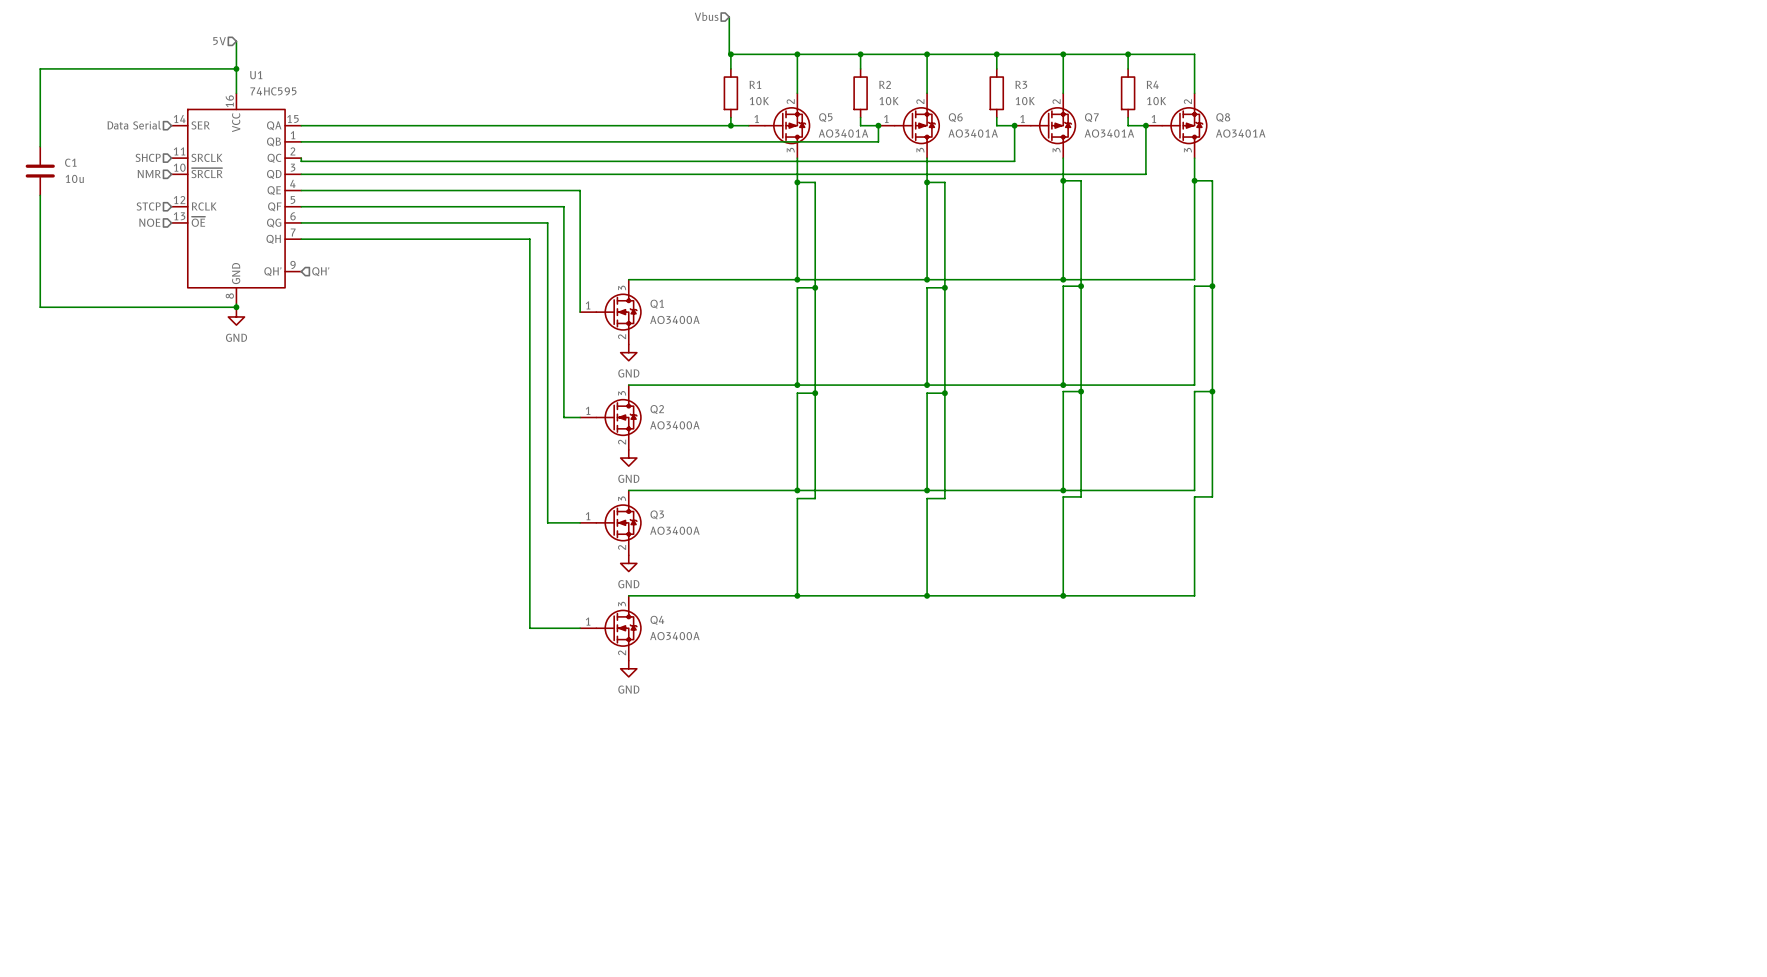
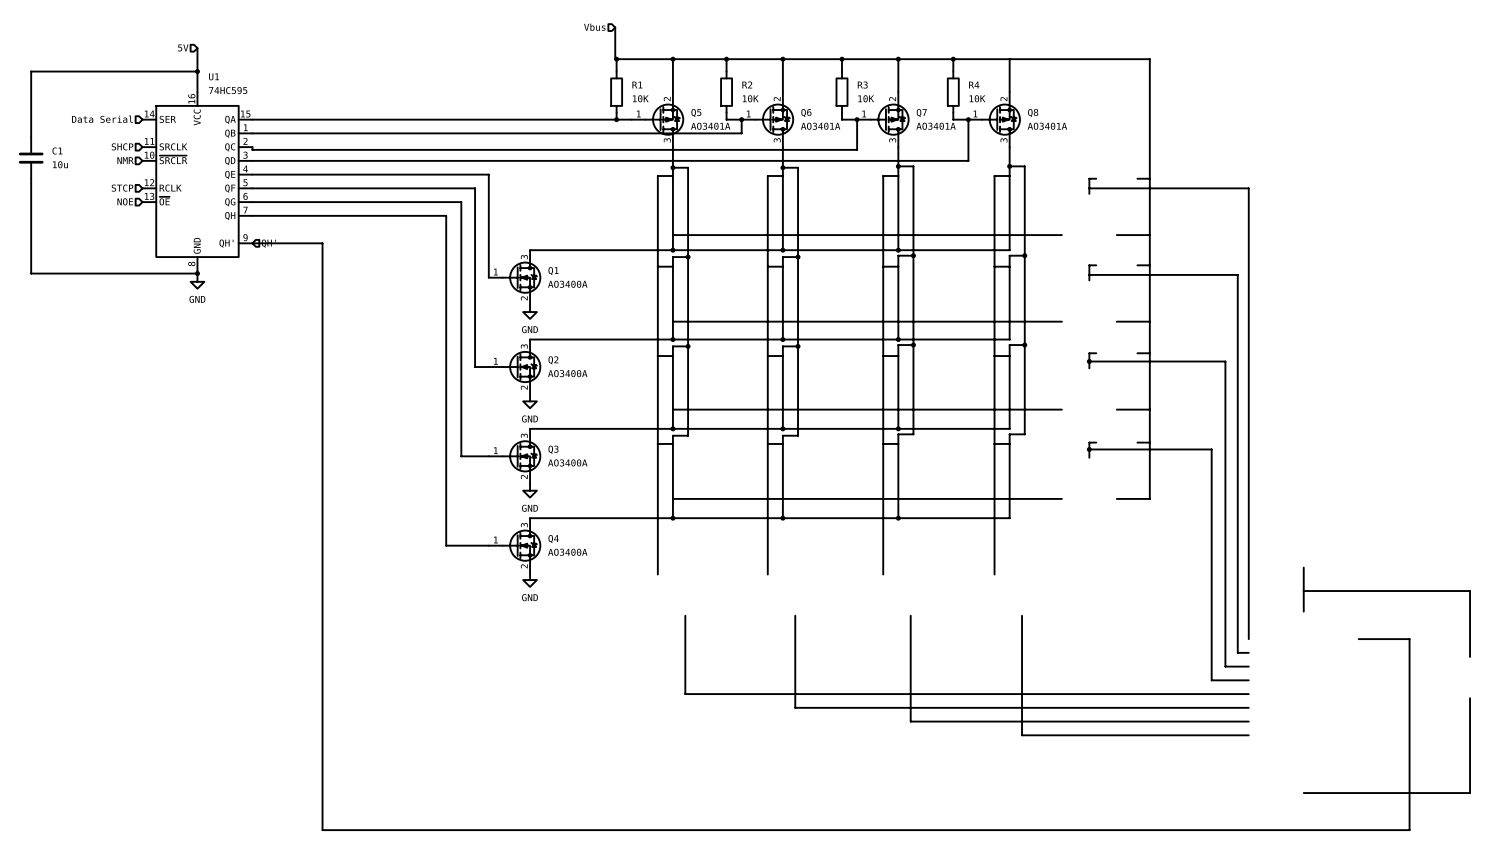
wire: none -> (1009, 59) (1149, 59) (1149, 498) (1116, 498)
wire: none -> (672, 175) (657, 175) (657, 574)
wire: none -> (782, 175) (767, 175) (767, 574)
wire: none -> (898, 175) (883, 175) (883, 574)
wire: none -> (1009, 175) (994, 175) (994, 574)
wire: none -> (1096, 178) (1089, 178) (1089, 193)
wire: none -> (1137, 178) (1149, 178)
wire: none -> (1089, 188) (1248, 188) (1248, 639)
wire: none -> (672, 235) (1061, 235)
wire: none -> (1116, 235) (1149, 235)
wire: none -> (252, 243) (322, 243) (322, 830) (1409, 830) (1409, 639) (1358, 639)
wire: none -> (1096, 265) (1089, 265) (1089, 280)
wire: none -> (1137, 265) (1149, 265)
wire: none -> (657, 266) (672, 266)
wire: none -> (767, 266) (782, 266)
wire: none -> (883, 266) (898, 266)
wire: none -> (994, 266) (1009, 266)
wire: none -> (1089, 274) (1237, 274) (1237, 652) (1248, 652)
wire: none -> (672, 321) (1061, 321)
wire: none -> (1116, 321) (1149, 321)
wire: none -> (1096, 353) (1089, 353) (1089, 368)
wire: none -> (1137, 353) (1149, 353)
wire: none -> (657, 356) (672, 356)
wire: none -> (767, 356) (782, 356)
wire: none -> (883, 356) (898, 356)
wire: none -> (994, 356) (1009, 356)
wire: none -> (1089, 361) (1225, 361) (1225, 666) (1248, 666)
junction: none -> (1089, 361)
wire: none -> (672, 409) (1061, 409)
wire: none -> (1116, 409) (1149, 409)
wire: none -> (1096, 442) (1089, 442) (1089, 457)
wire: none -> (1137, 442) (1149, 442)
wire: none -> (657, 443) (672, 443)
wire: none -> (767, 443) (782, 443)
wire: none -> (883, 443) (898, 443)
wire: none -> (994, 443) (1009, 443)
wire: none -> (1089, 449) (1211, 449) (1211, 680) (1248, 680)
junction: none -> (1089, 449)
wire: none -> (672, 498) (1061, 498)
wire: none -> (1303, 567) (1303, 611)
wire: none -> (1303, 591) (1470, 591) (1470, 656)
wire: none -> (685, 615) (685, 694) (1248, 694)
wire: none -> (795, 615) (795, 707) (1248, 707)
wire: none -> (910, 615) (910, 721) (1248, 721)
wire: none -> (1022, 615) (1022, 735) (1248, 735)
wire: none -> (1470, 698) (1470, 793) (1303, 793)

